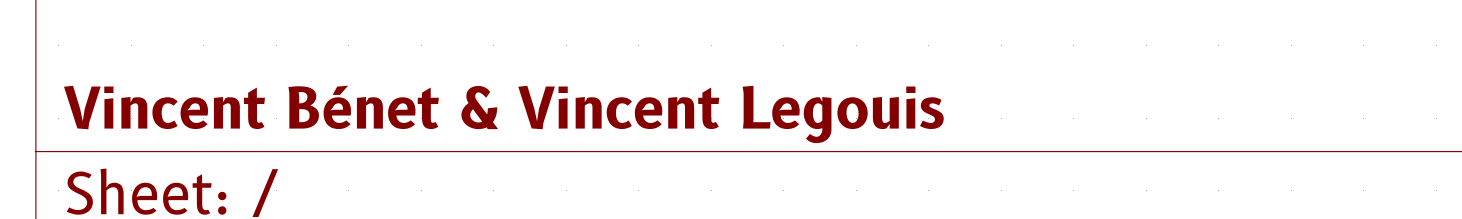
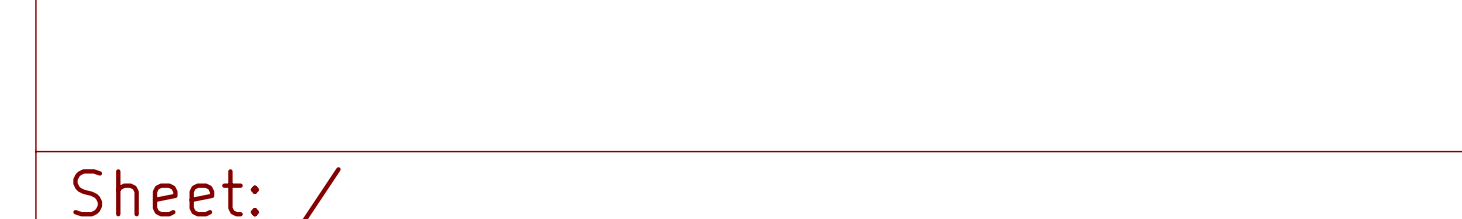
title block: Vincent Bénet & Vincent Legouis (503, 114) -> none

